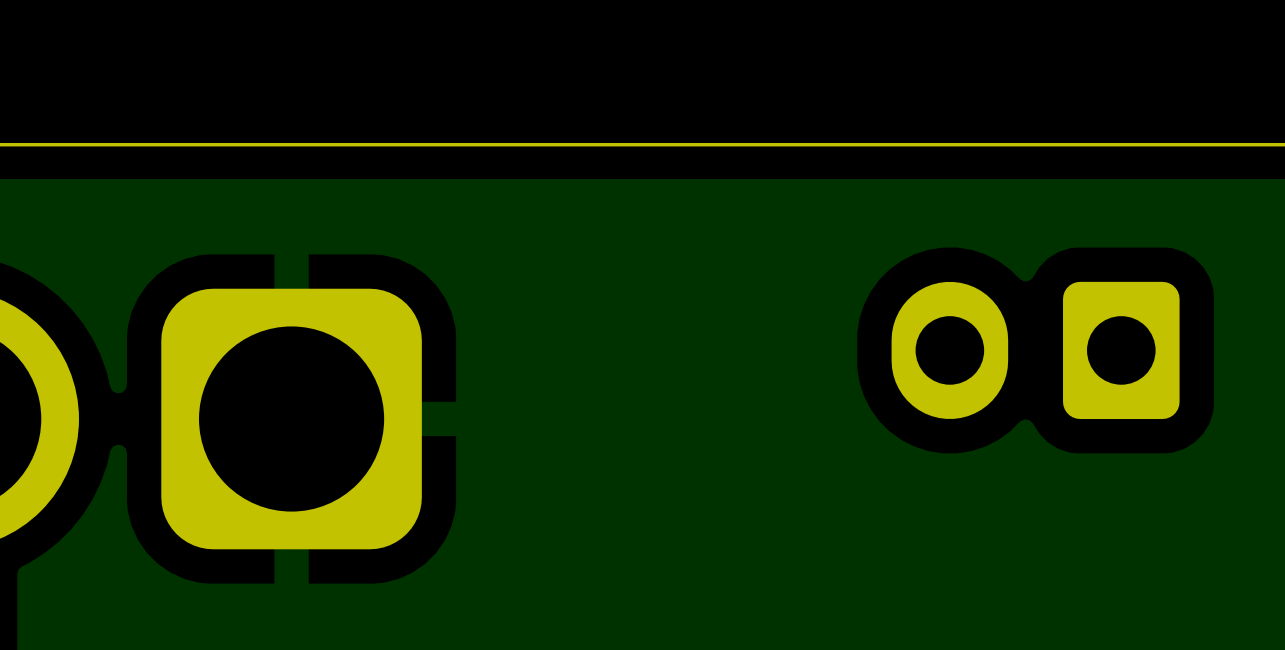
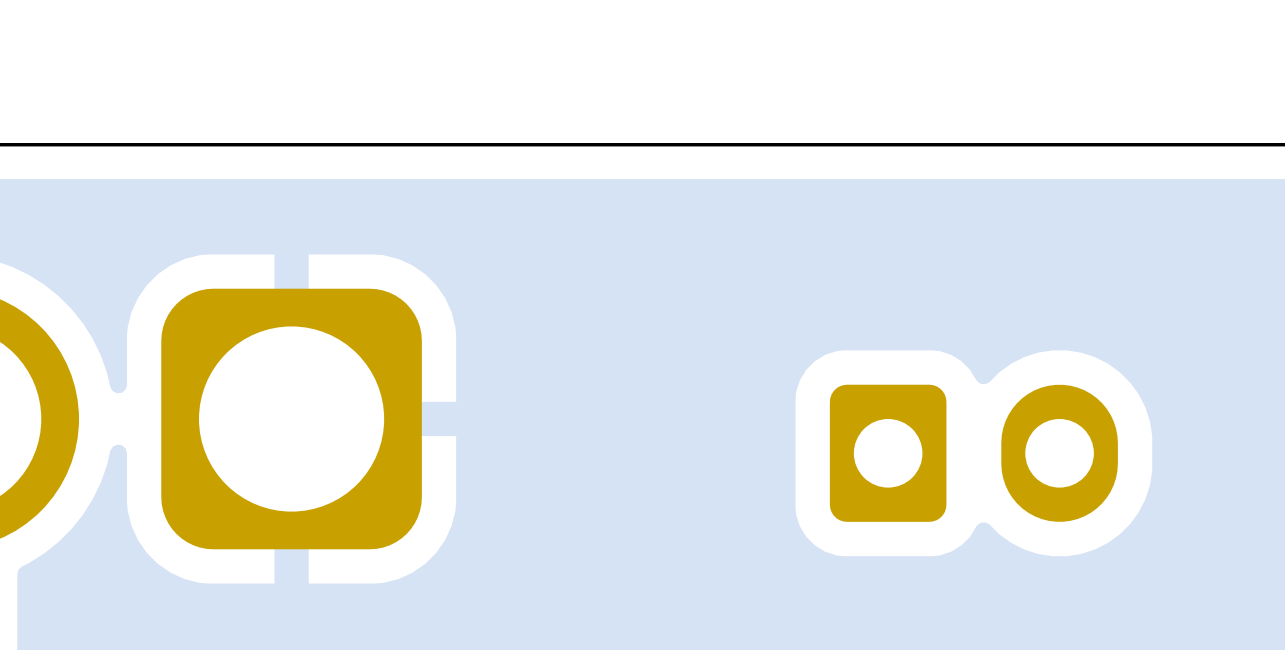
part rotation: 0° (1035, 350) -> 180° (973, 453)

